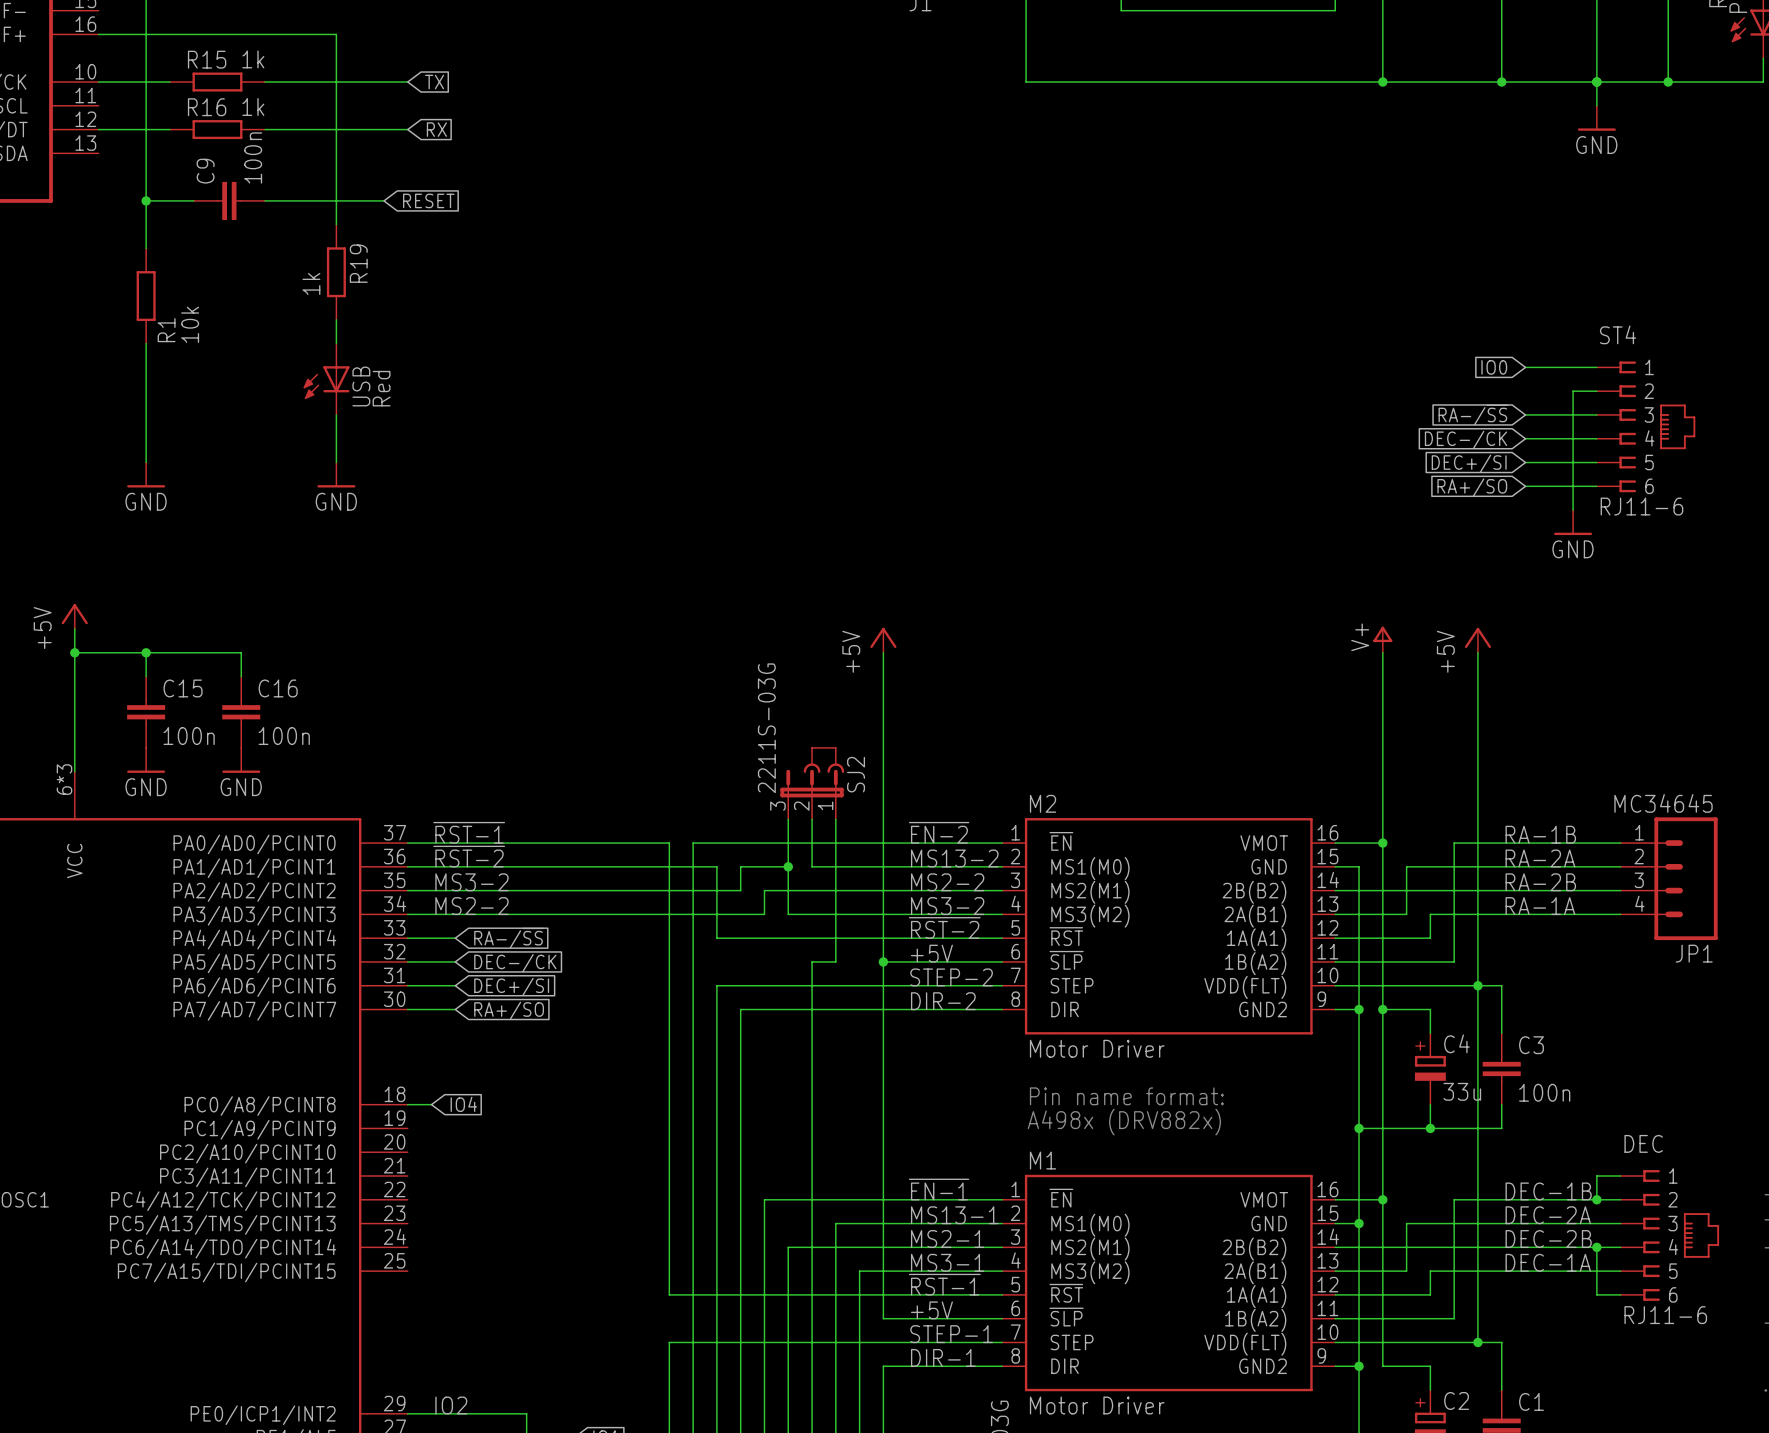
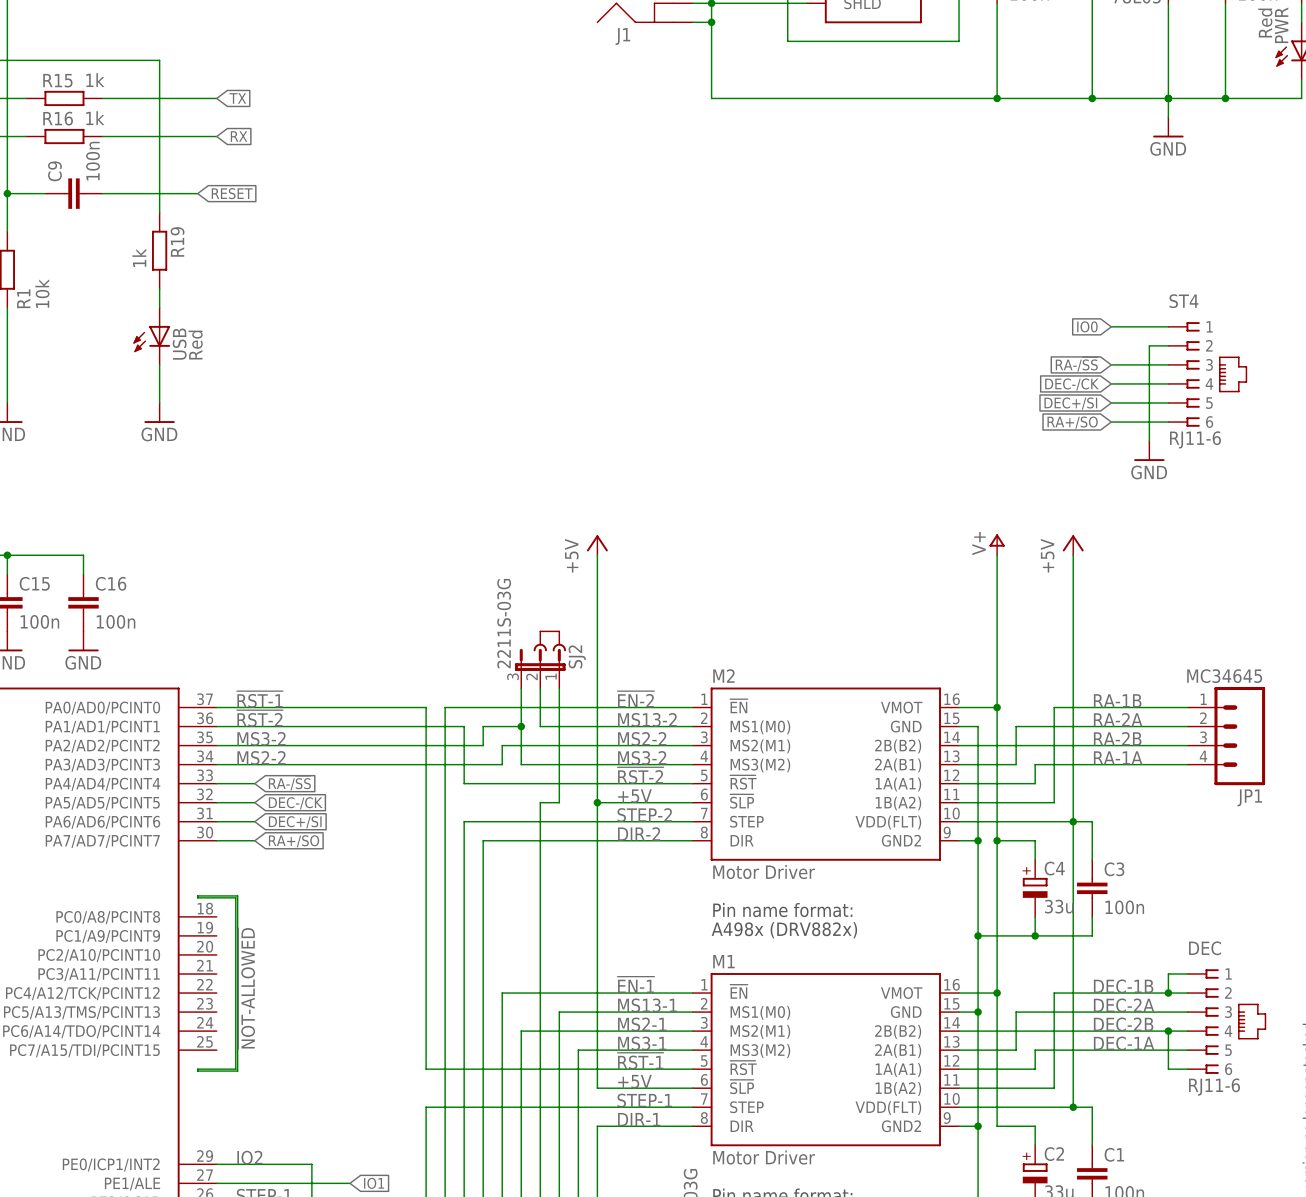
wire: none -> (197, 895) (197, 897) (235, 897) (235, 1069) (197, 1069) (197, 1071) (237, 1071) (237, 895) (197, 895)
wire: (407, 1104) (431, 1104) -> none
global label: IO4 (463, 1104) -> none
label: none -> ~{NOT-ALLOWED} (246, 988)

